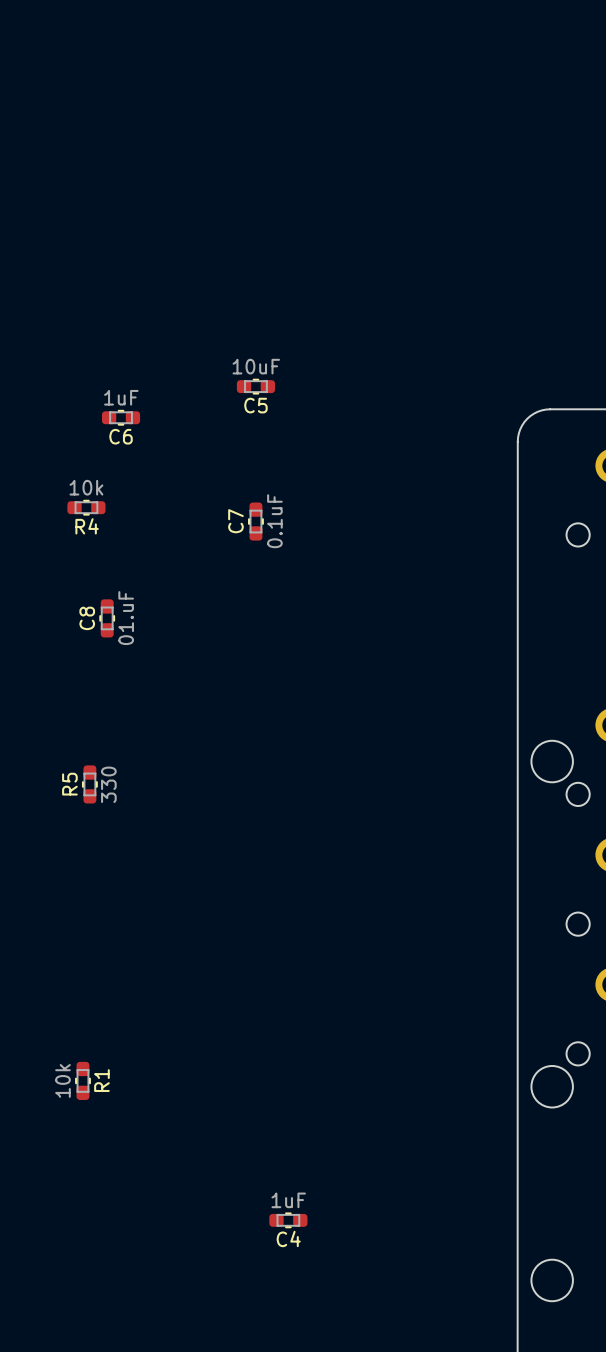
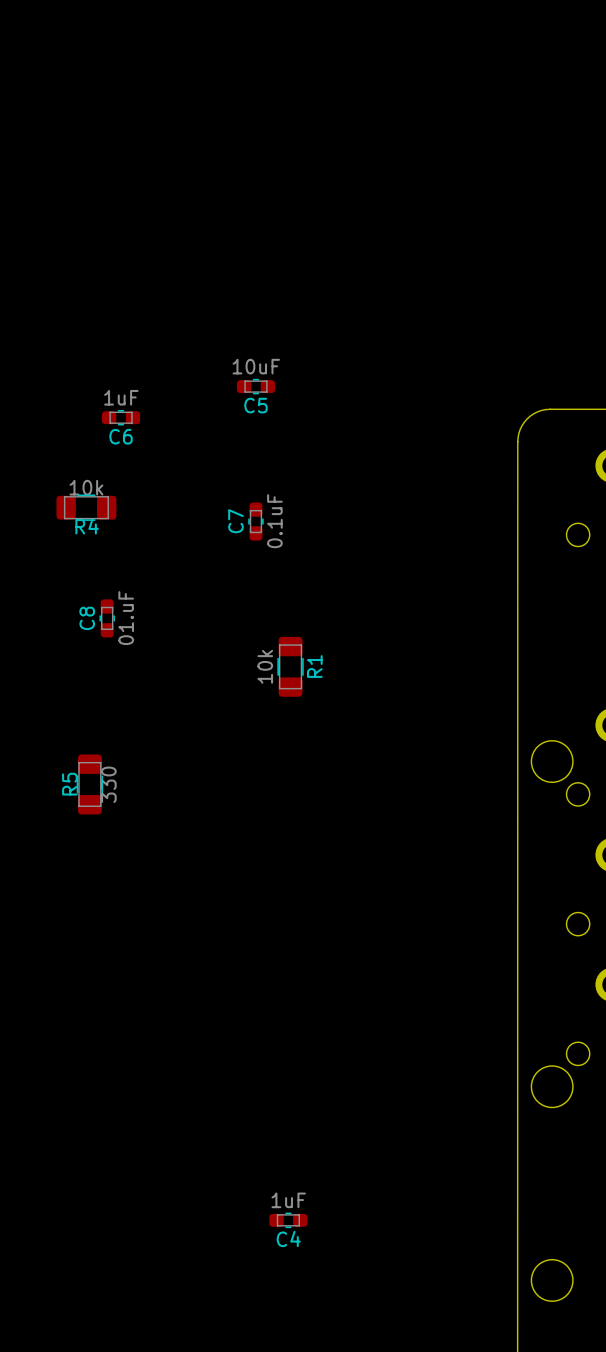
R4 footprint: [67, 499, 106, 516] -> [56, 494, 117, 521]
R5 footprint: [82, 765, 98, 804] -> [76, 754, 104, 815]
R1 footprint: [75, 1061, 91, 1100] -> [277, 636, 304, 697]

